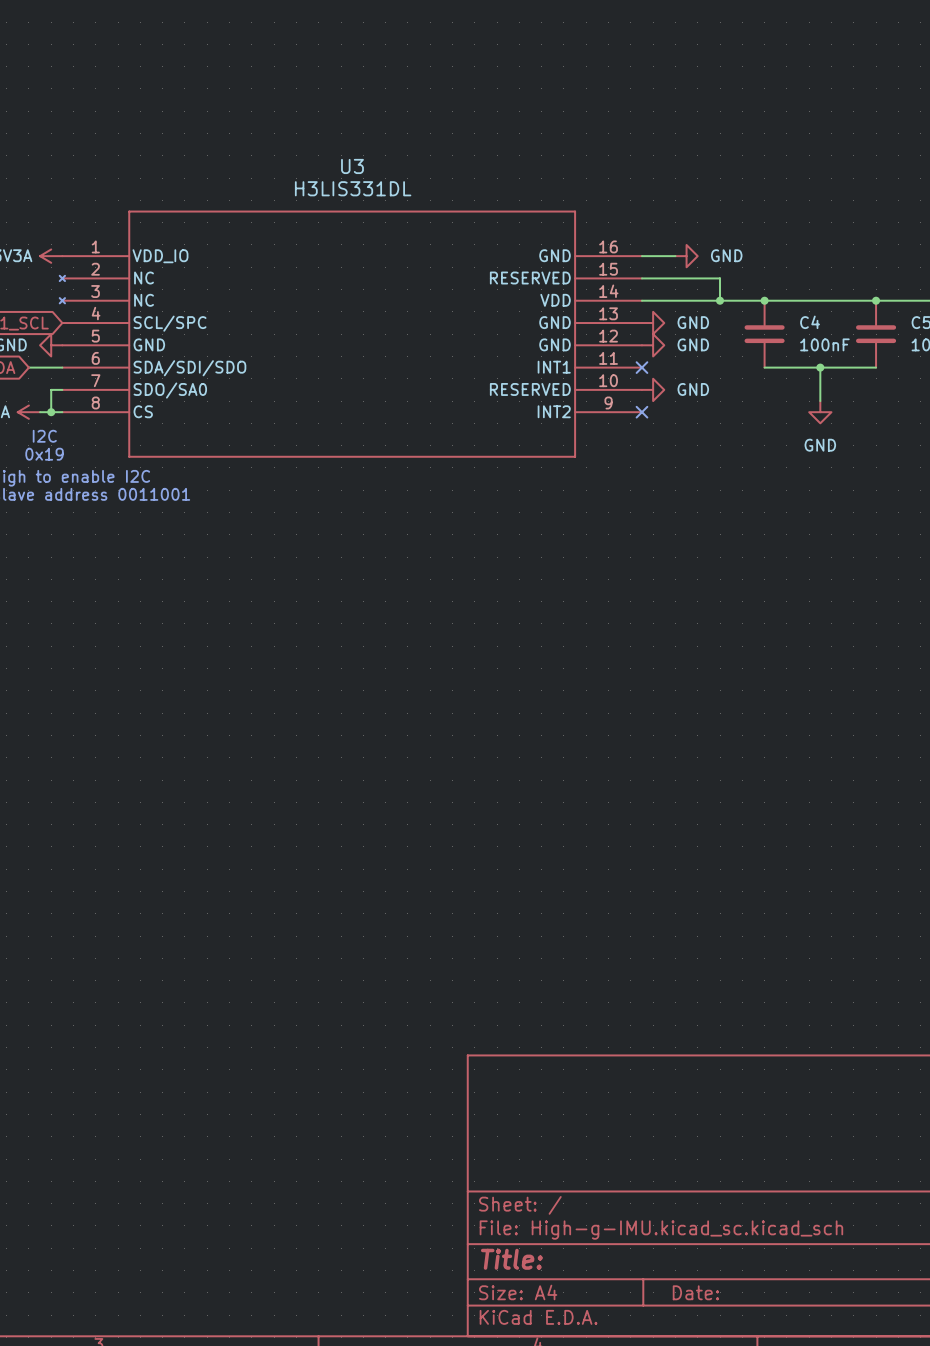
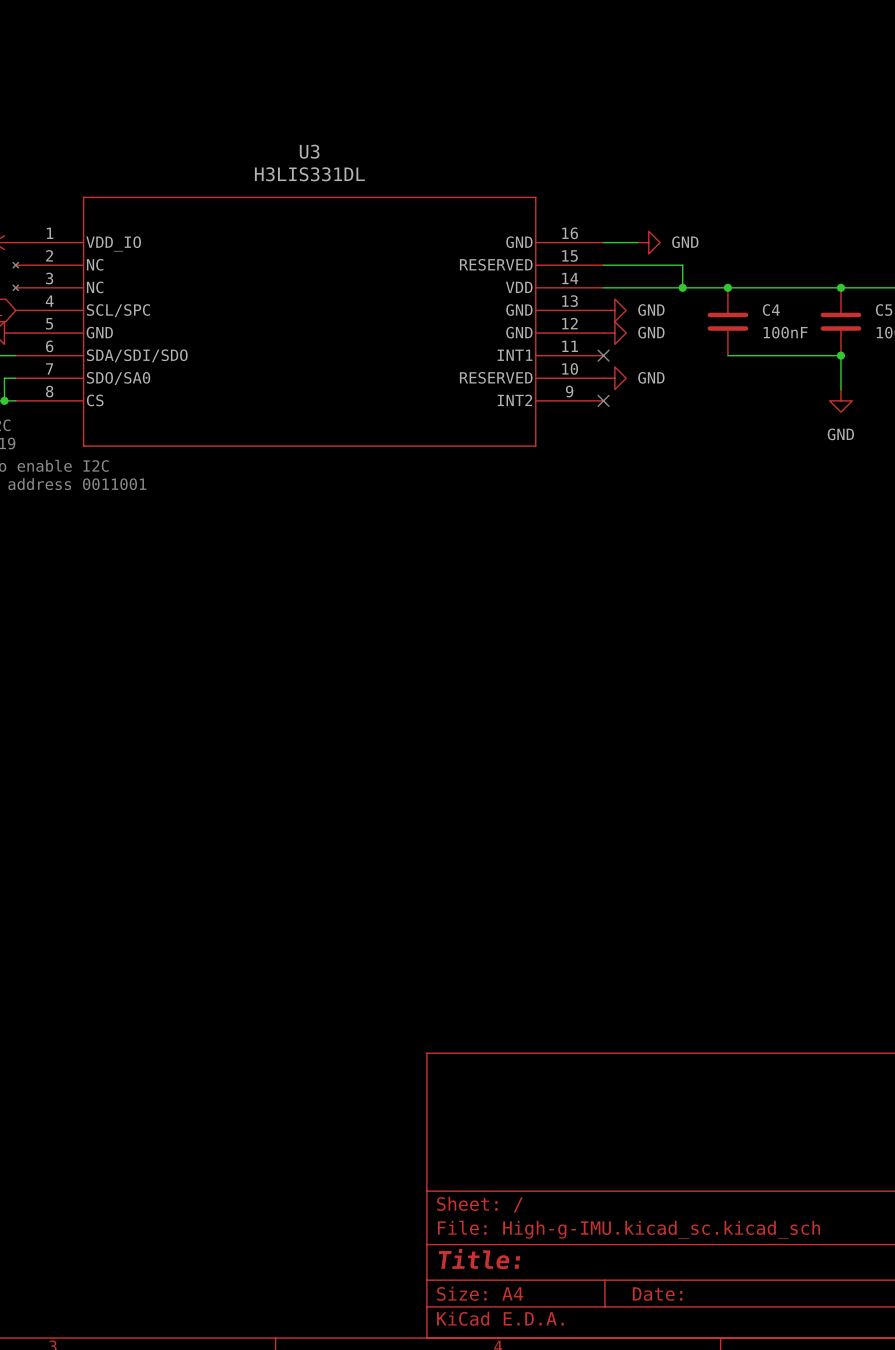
wire: (820, 367) (820, 401) -> (840, 355) (840, 389)
junction: (820, 367) -> none
junction: none -> (840, 355)
power symbol position: GND (820, 412) -> GND (840, 400)

